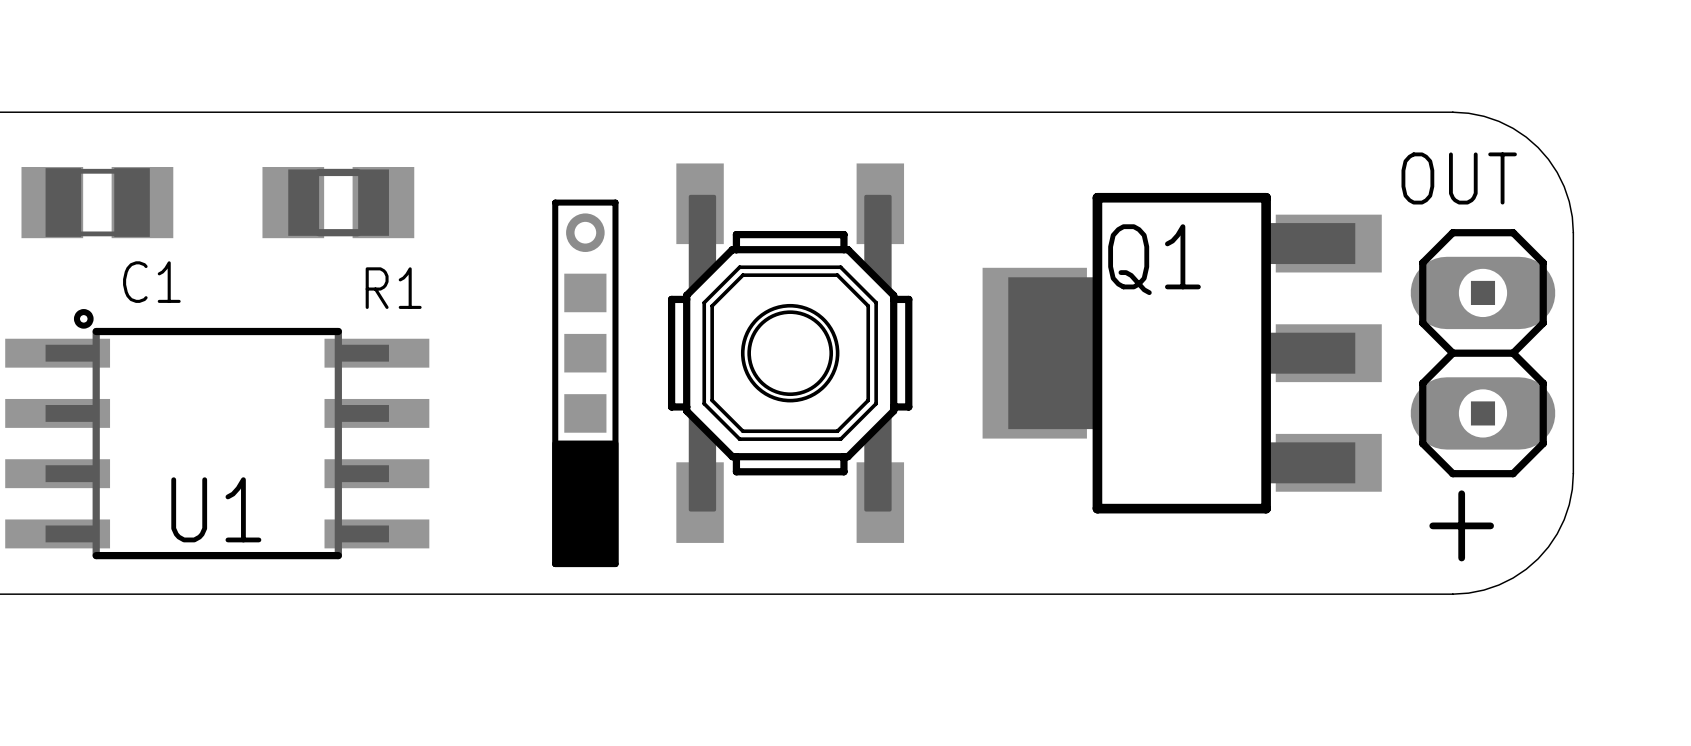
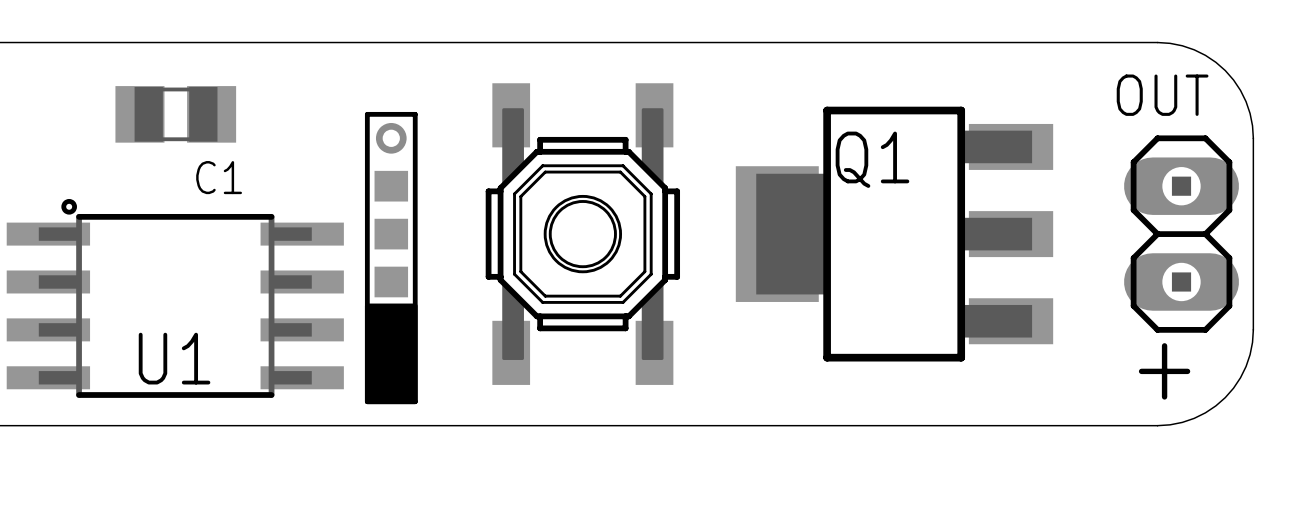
C1 position: (97, 202) -> (175, 114)
R1: (338, 202) -> none
part position: (790, 353) -> (582, 234)
Q1 position: (1182, 353) -> (894, 234)
part position: (585, 383) -> (391, 258)

